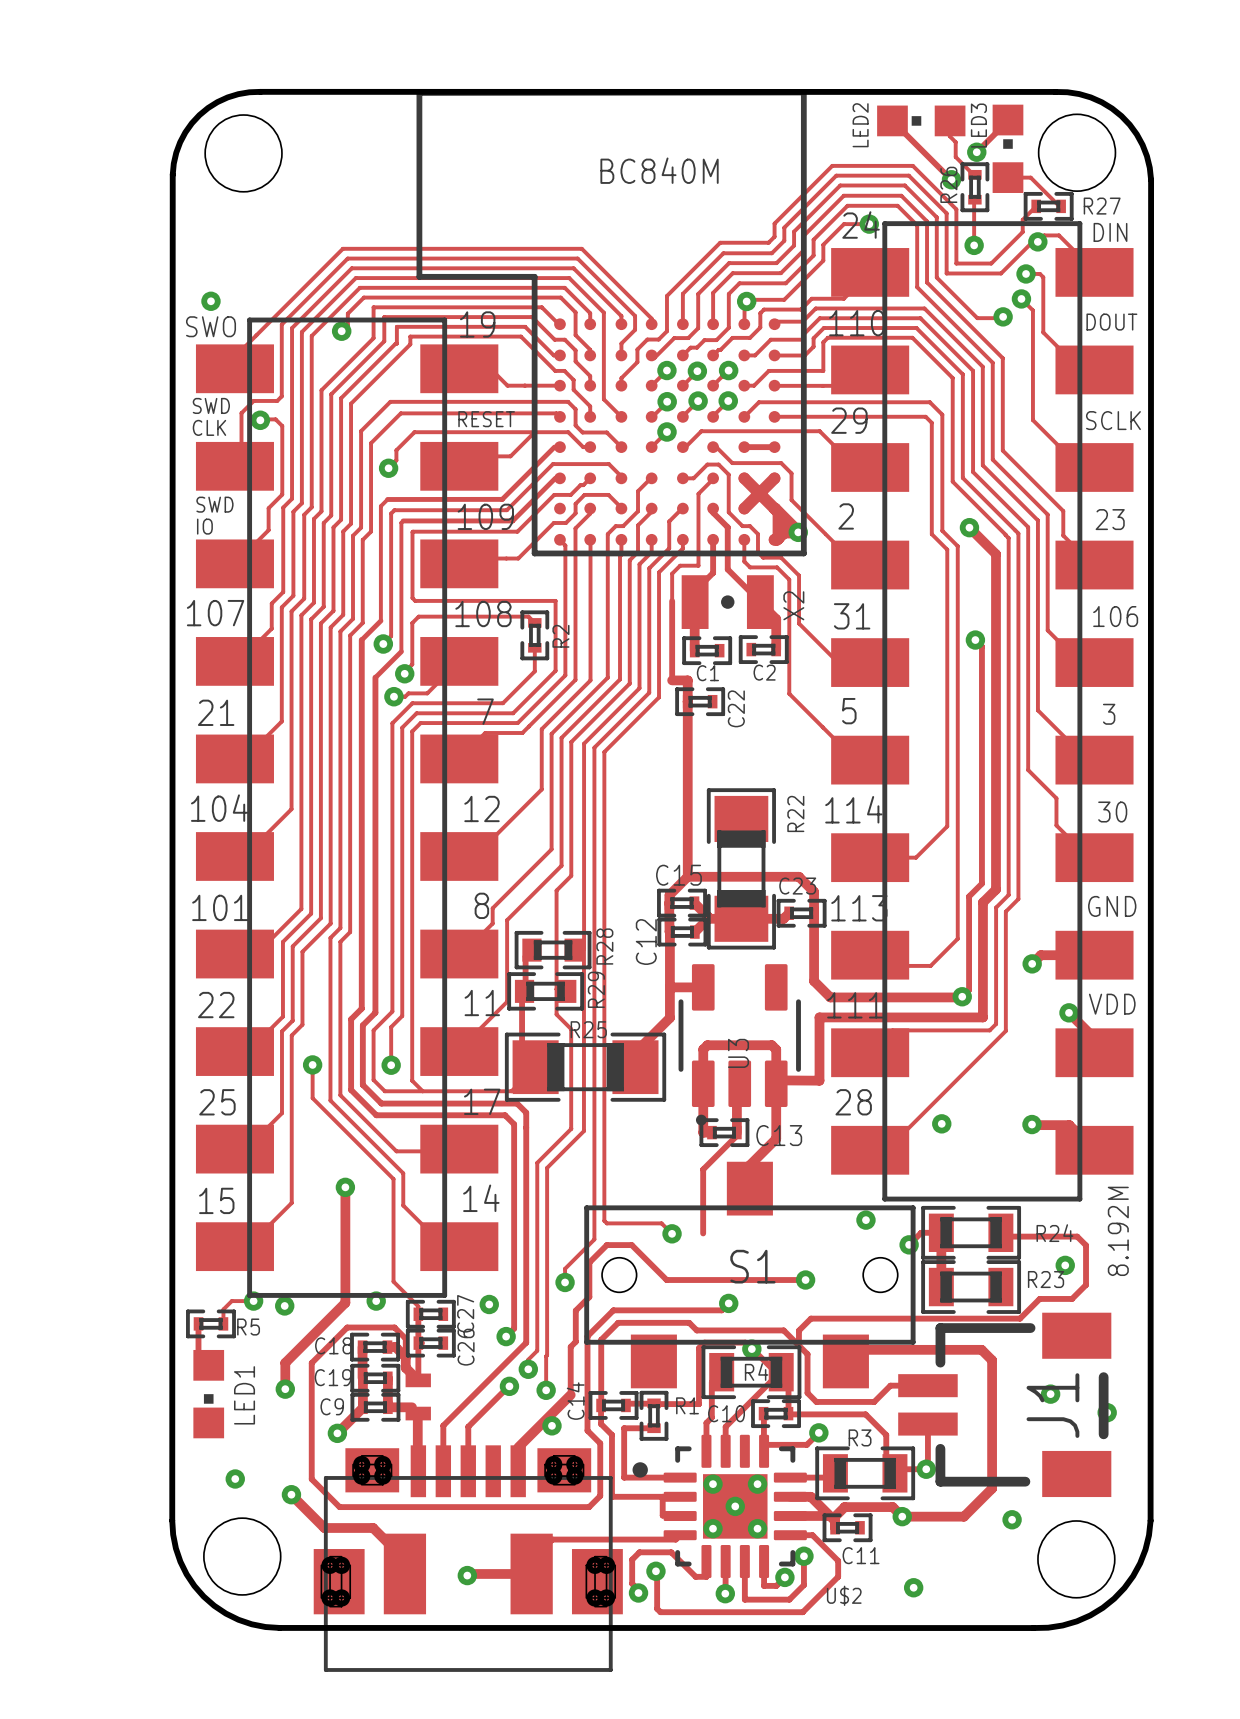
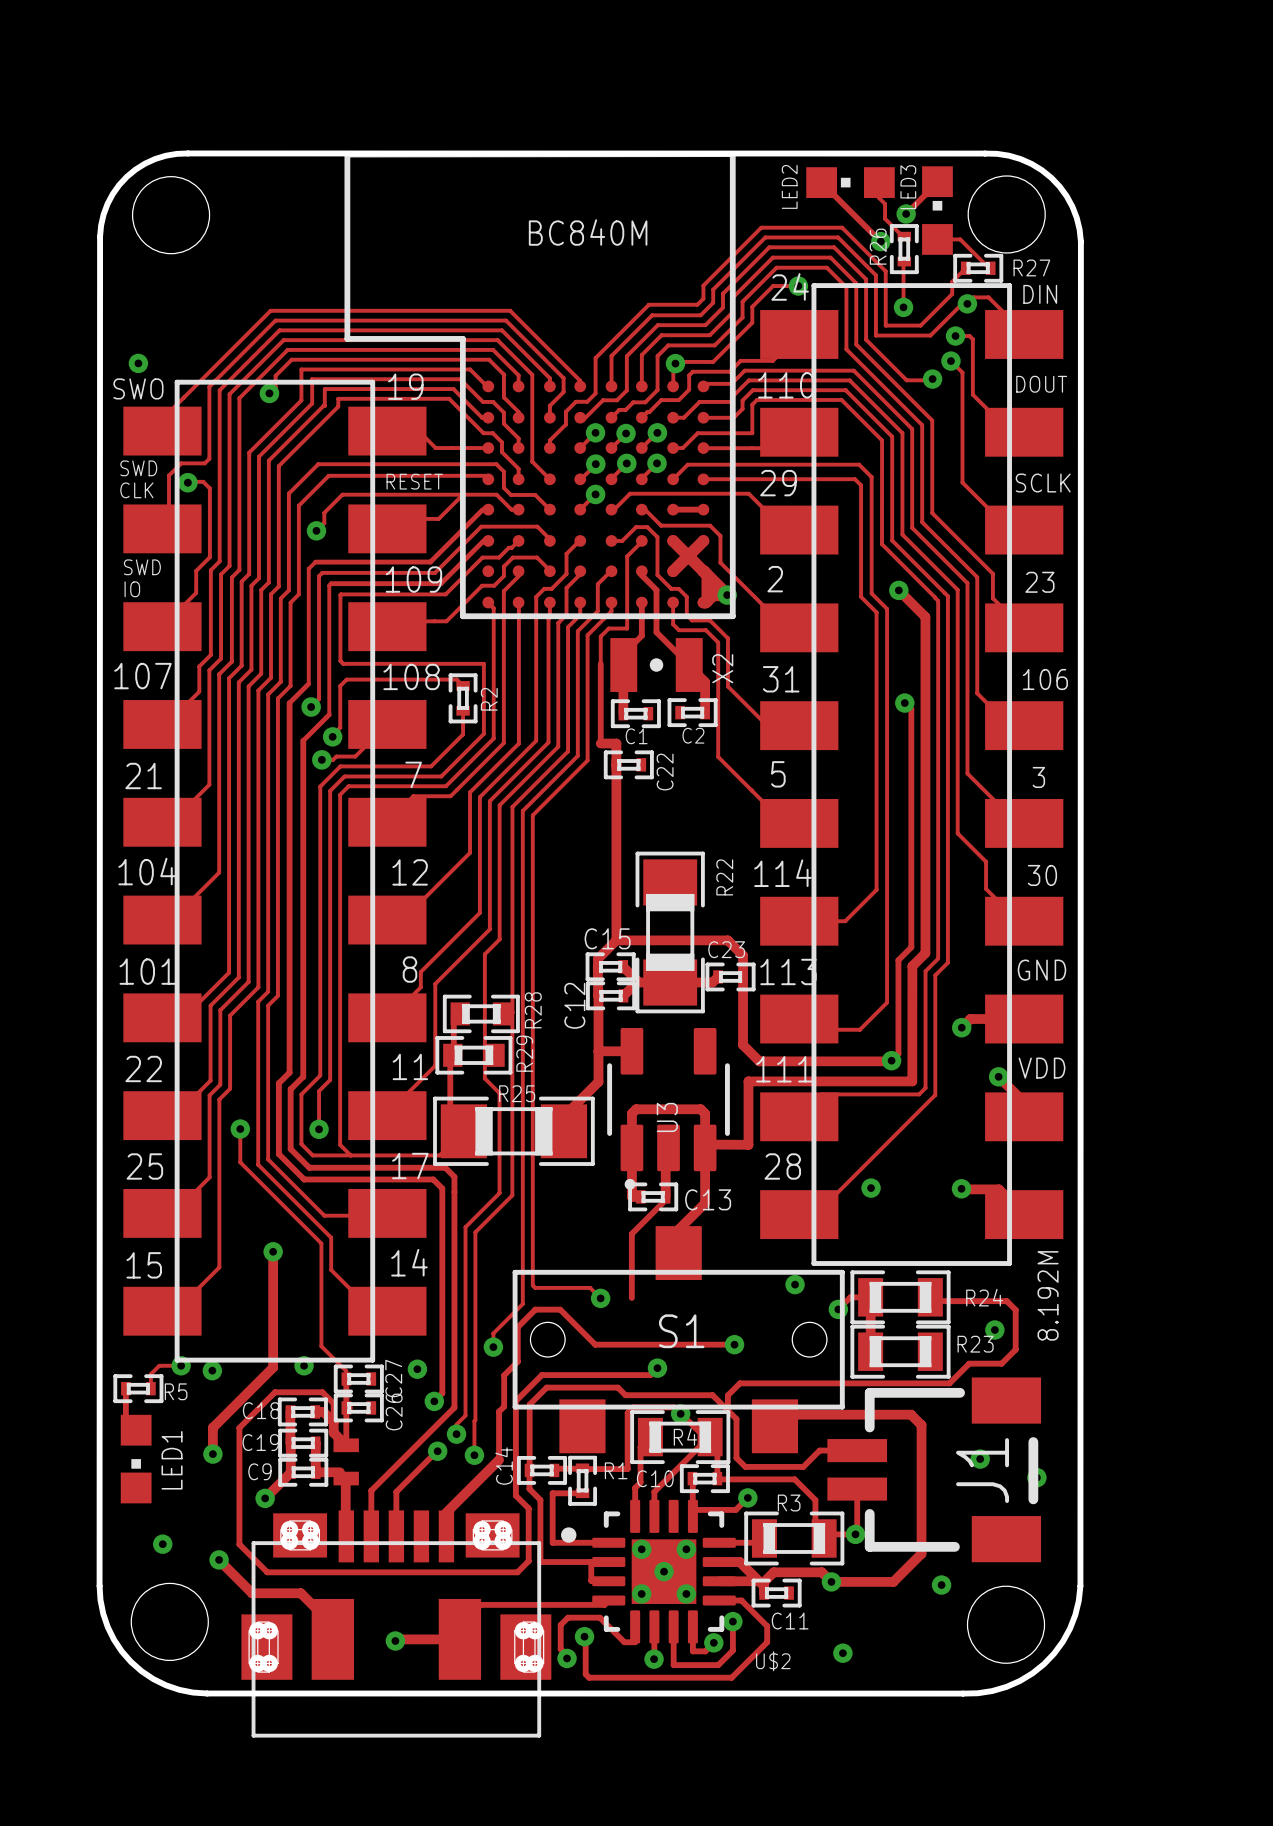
via: (551, 1425) -> none

